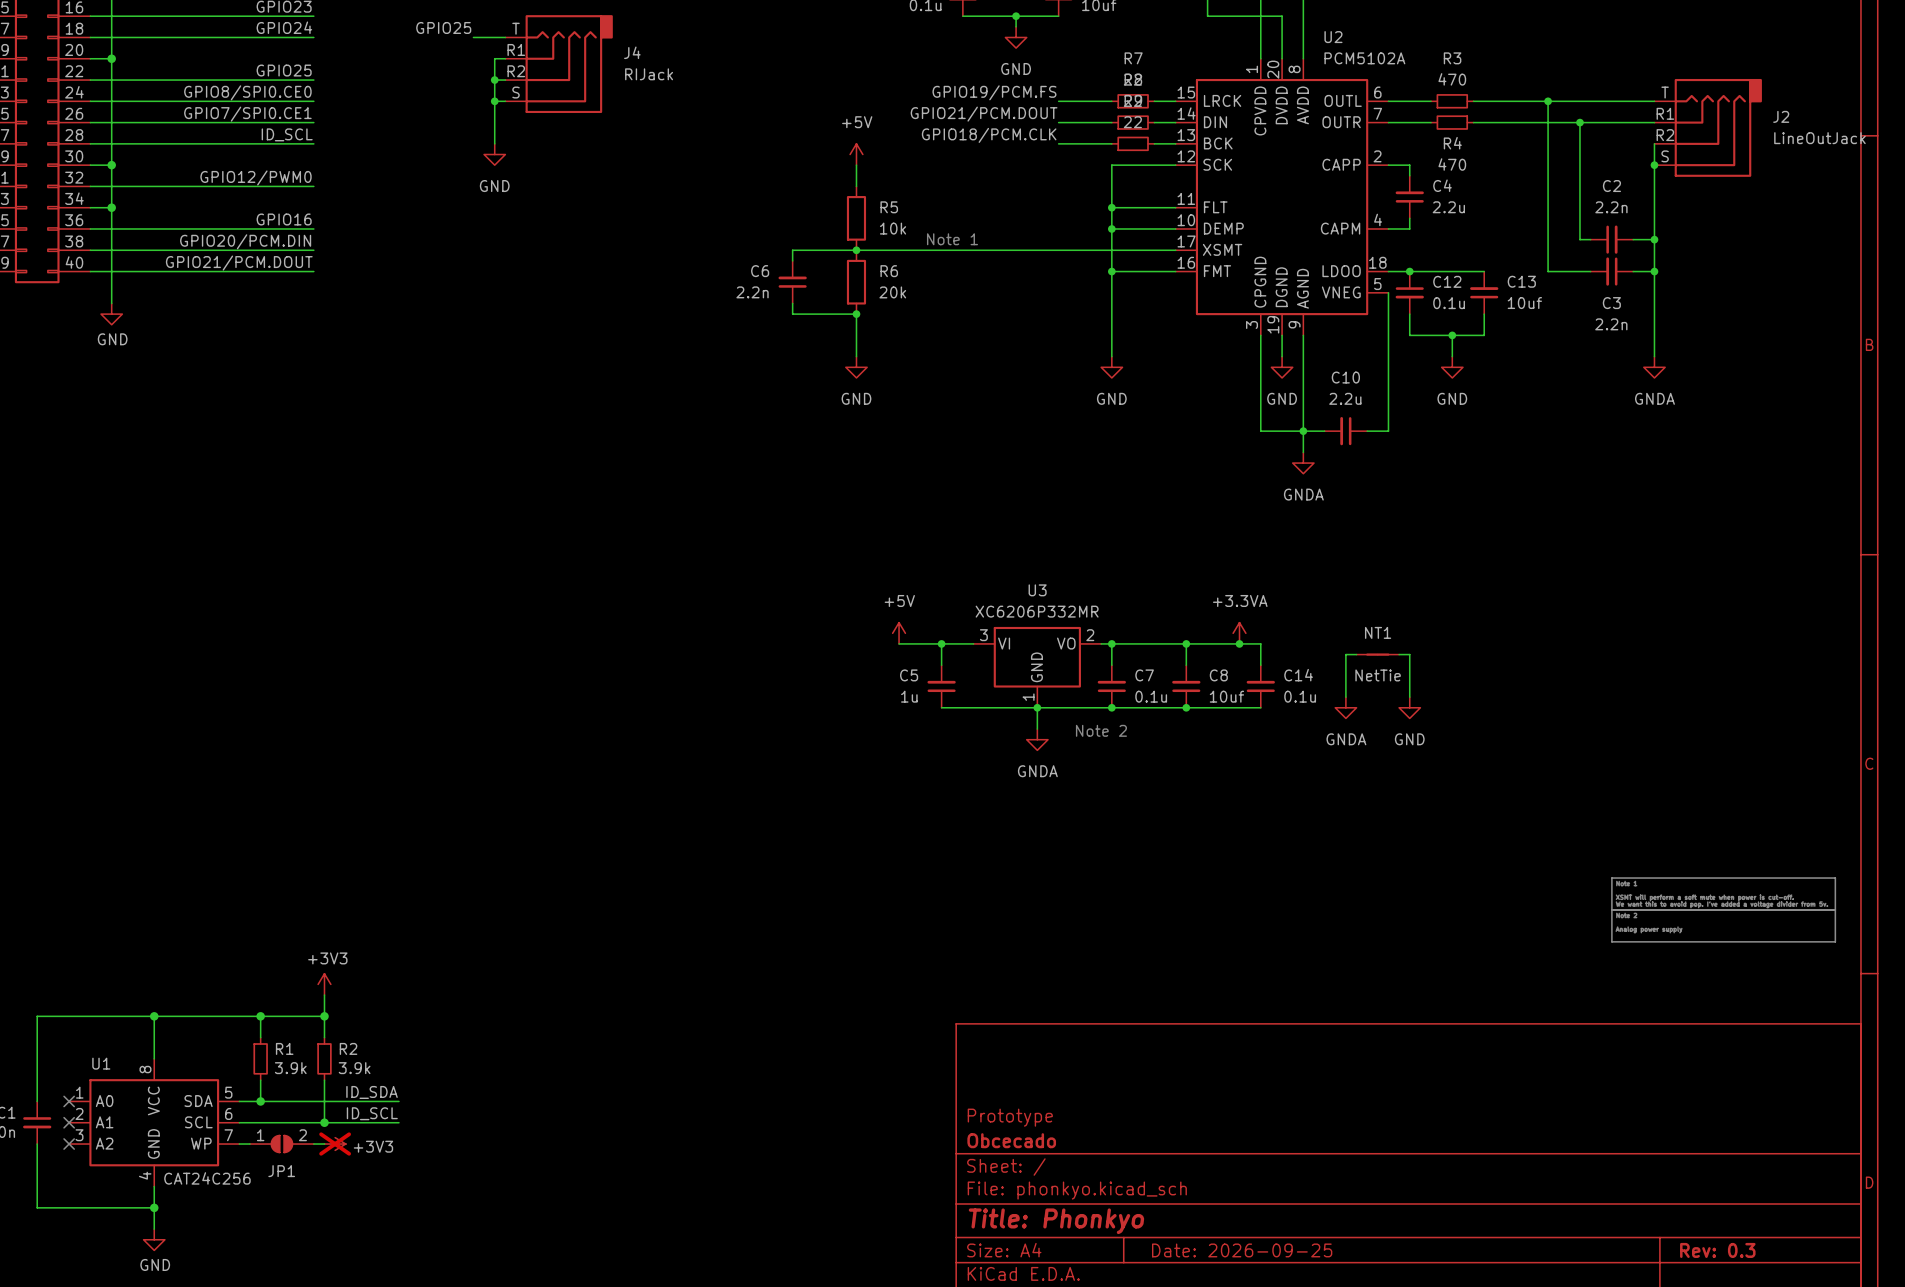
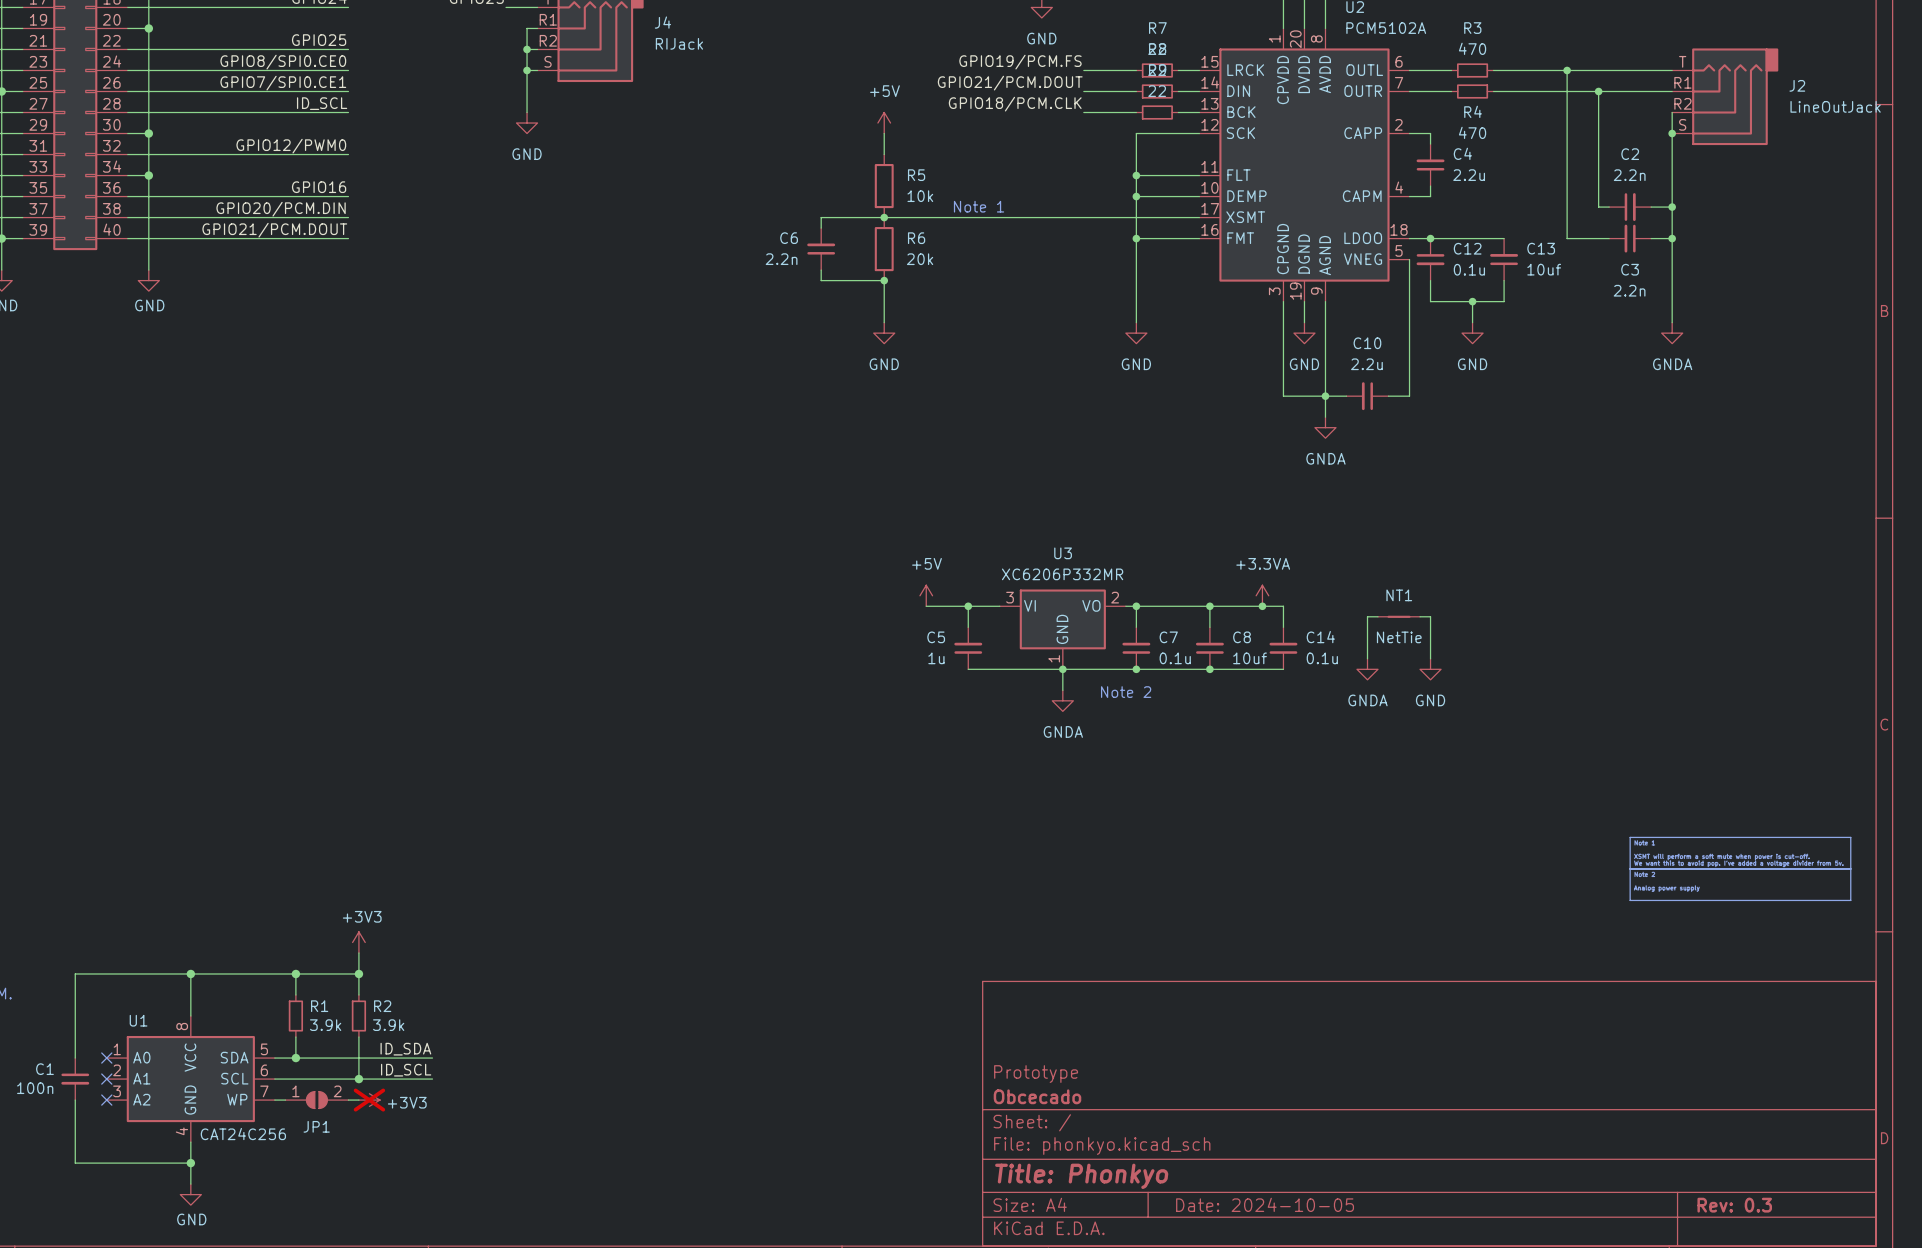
title block: Date: 2026-09-25 (1242, 1250) -> Date: 2024-10-05 (1265, 1204)

